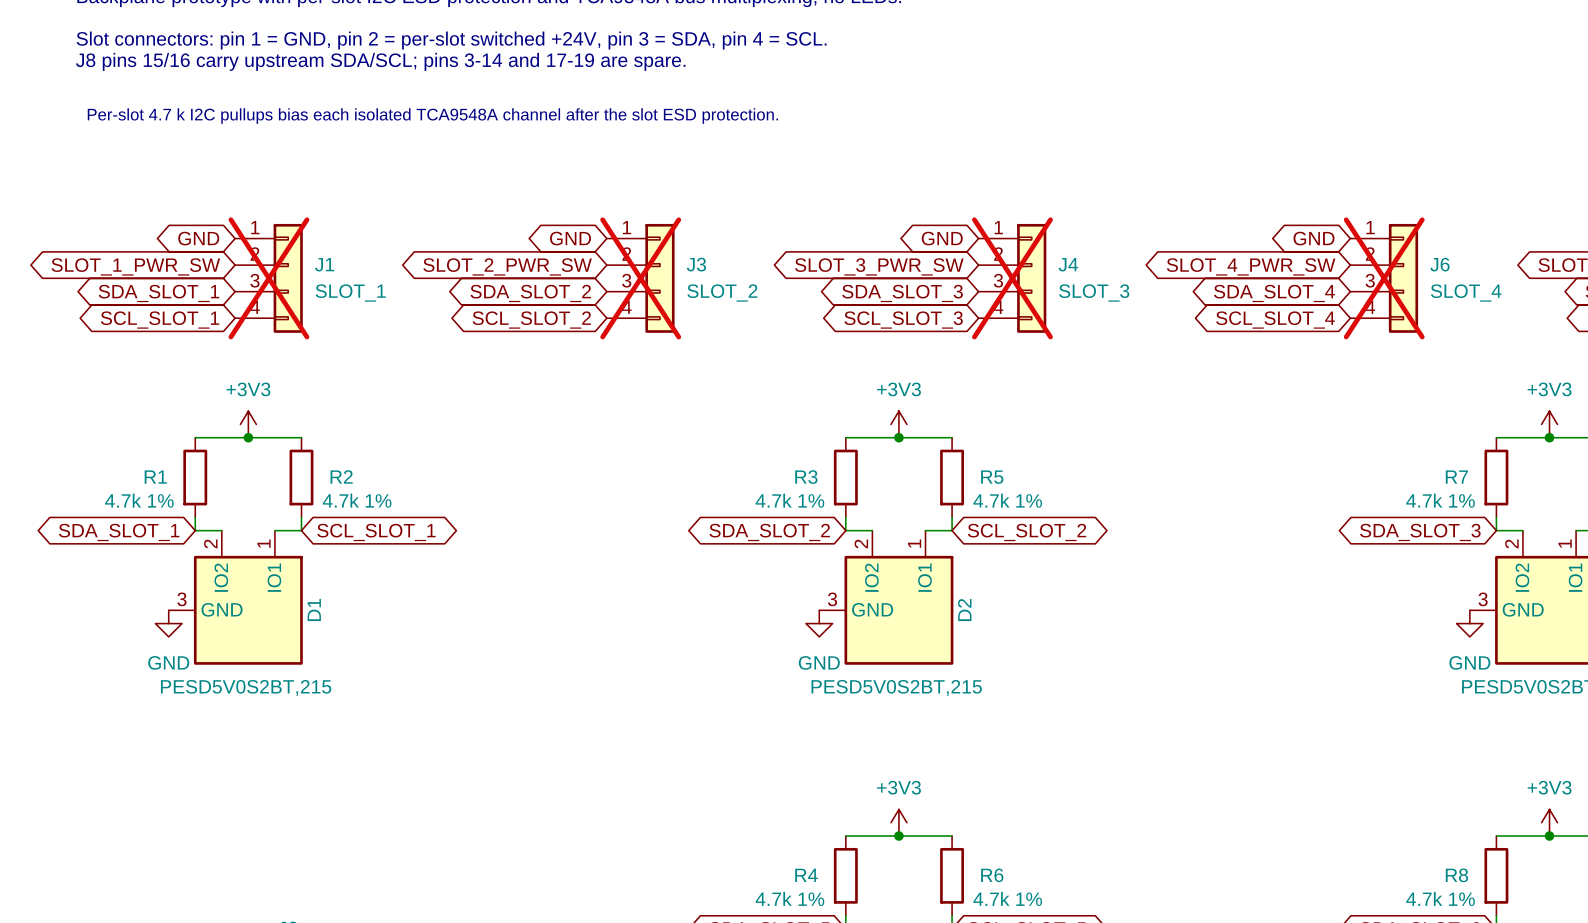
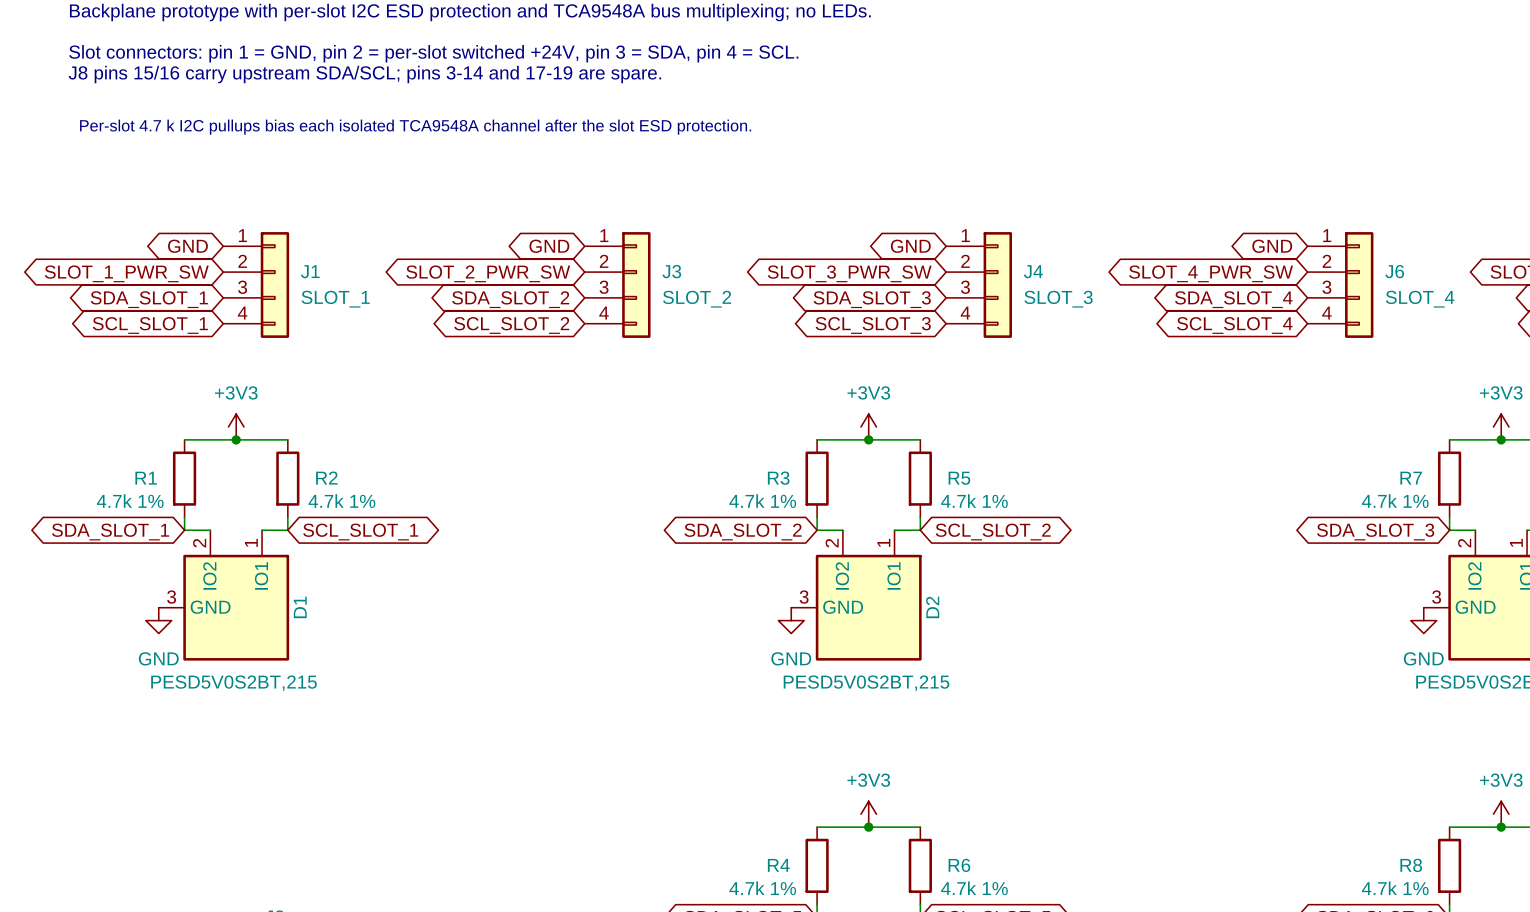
J1 do-not-place cross: (268, 278) -> none
J3 do-not-place cross: (640, 278) -> none
J4 do-not-place cross: (1012, 278) -> none
J6 do-not-place cross: (1384, 278) -> none

